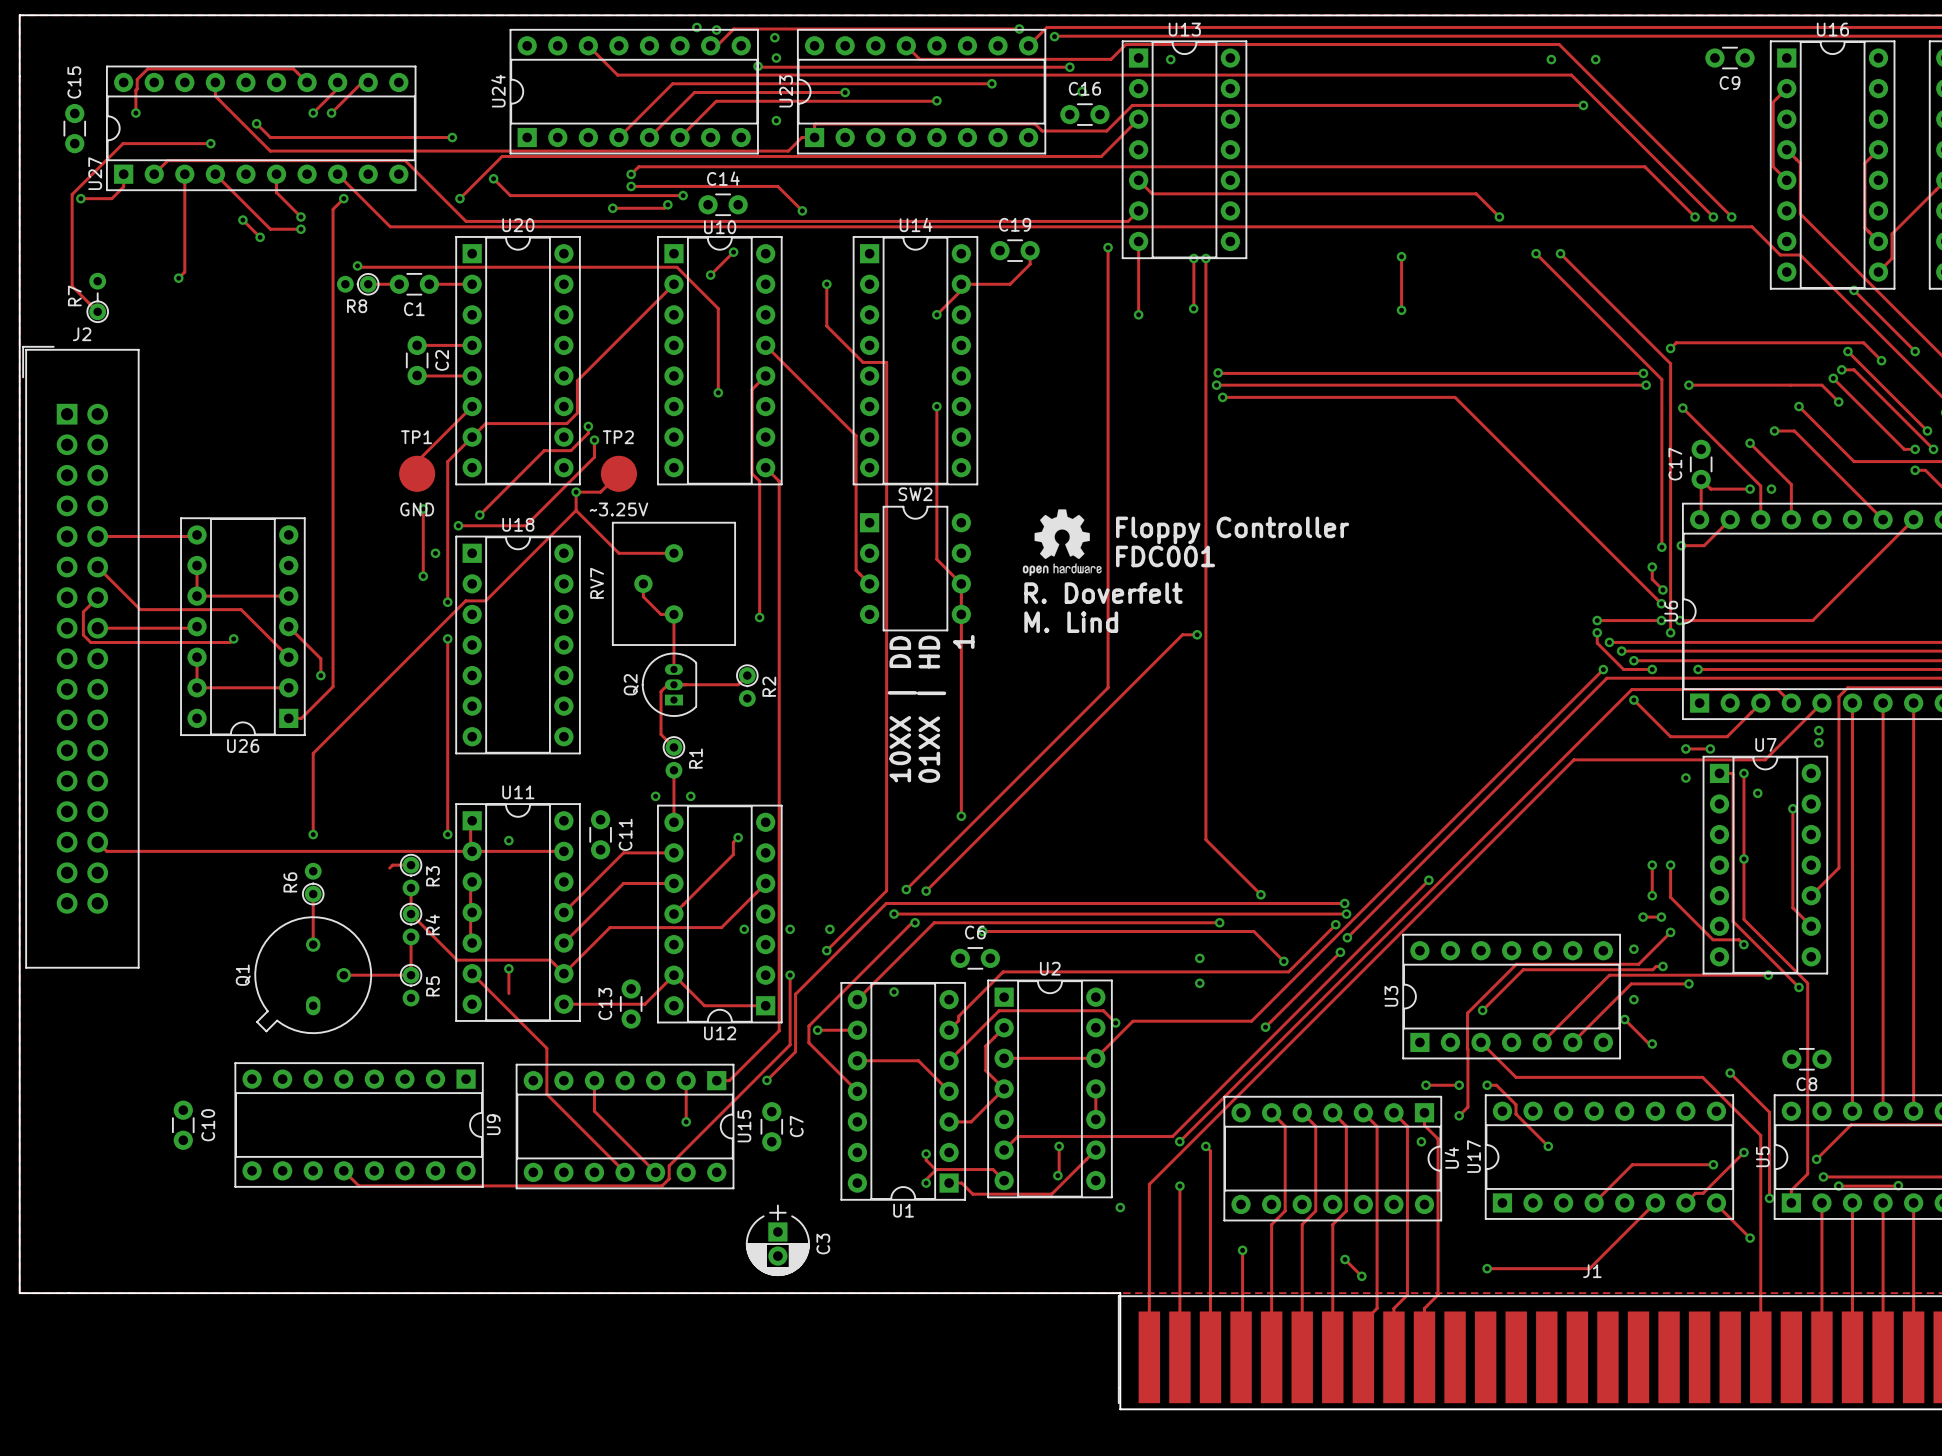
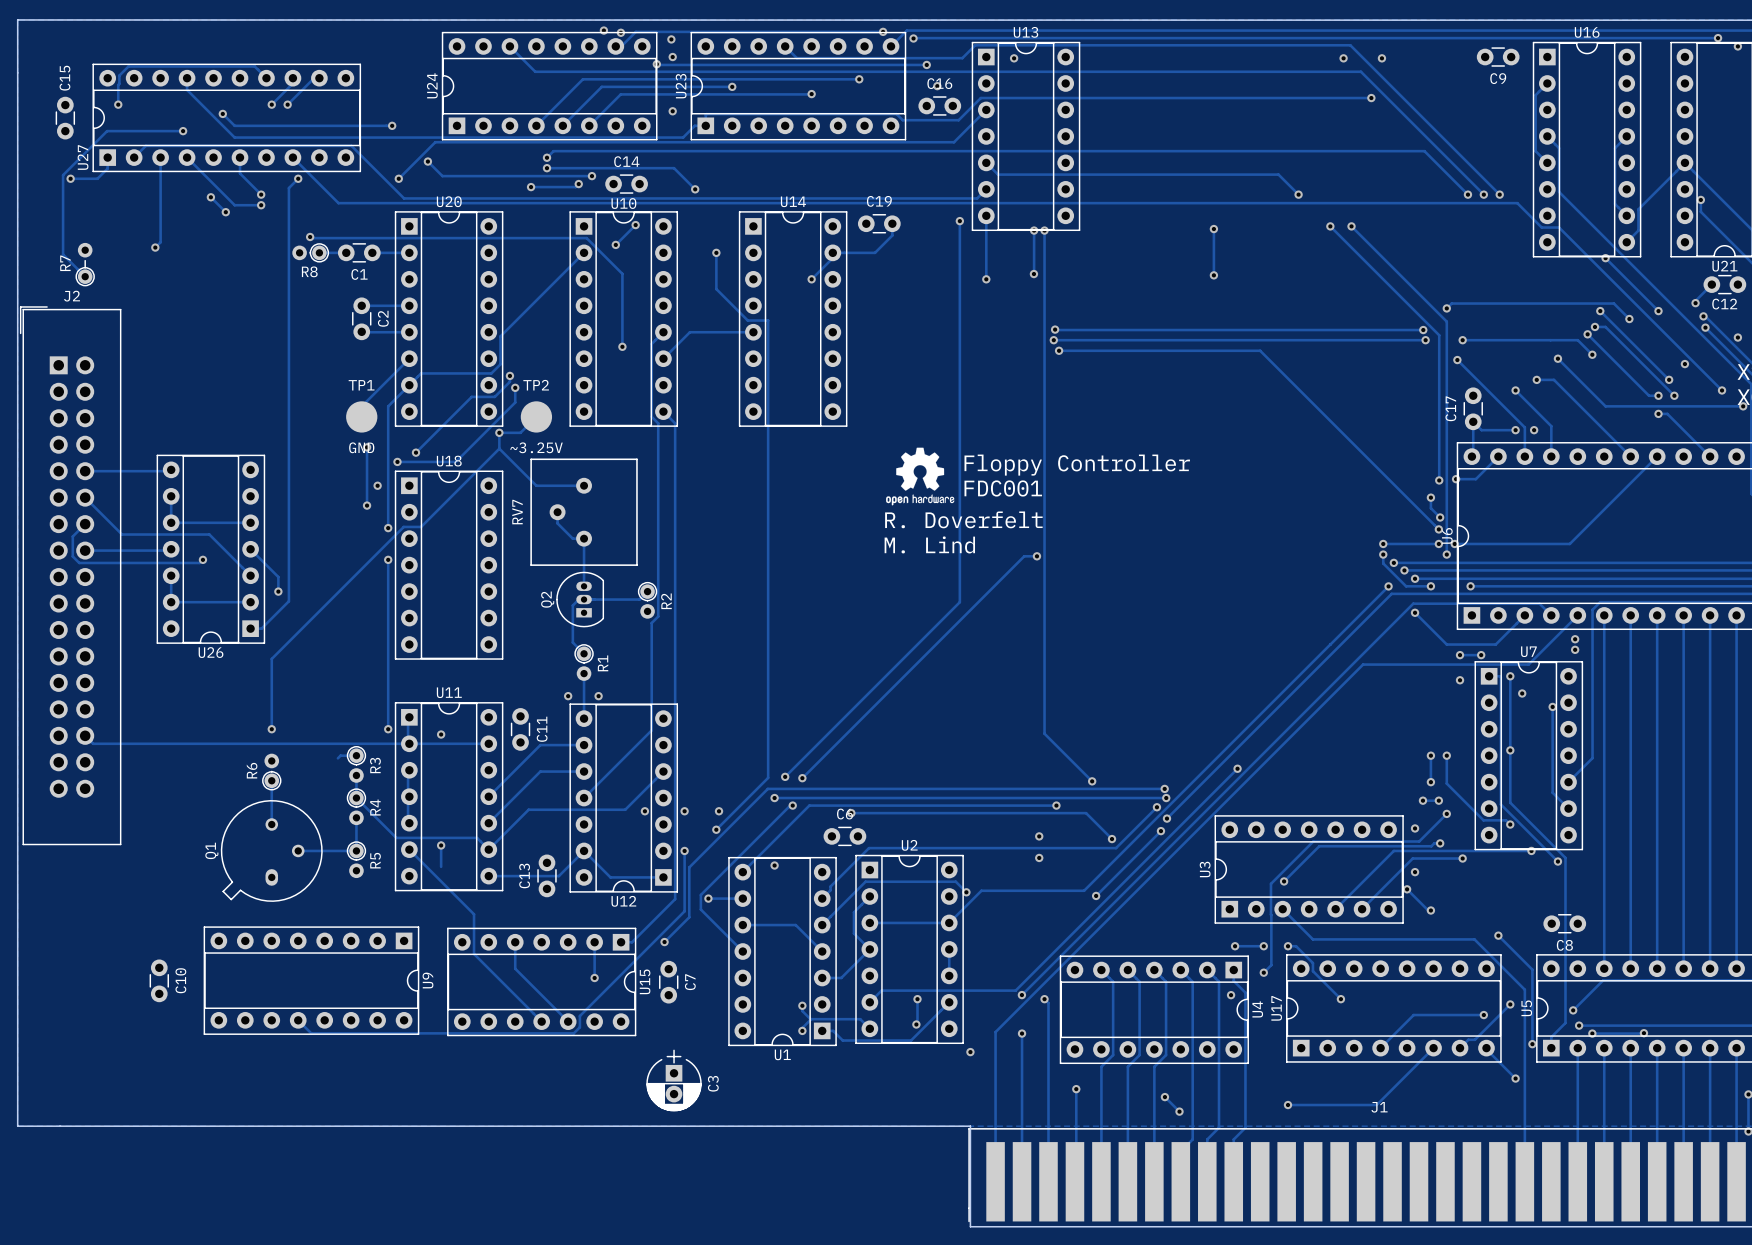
track: (765, 345) (856, 435) (856, 570) (869, 583) -> none
track: none -> (753, 332) (689, 332) (663, 358)
track: (936, 406) (936, 559) (961, 583) (961, 816) -> none
via: (936, 406) -> none
SW2: (915, 568) -> none
via: (759, 617) -> none
text: 1 (963, 641) -> none
text: 10XX | DD (902, 709) -> none
text: 01XX | HD (931, 709) -> none
via: (961, 816) -> none
track: (738, 837) (733, 842) (733, 854) -> (658, 541) (658, 616) (651, 623) (651, 730) (635, 746)
via: (738, 837) -> none

